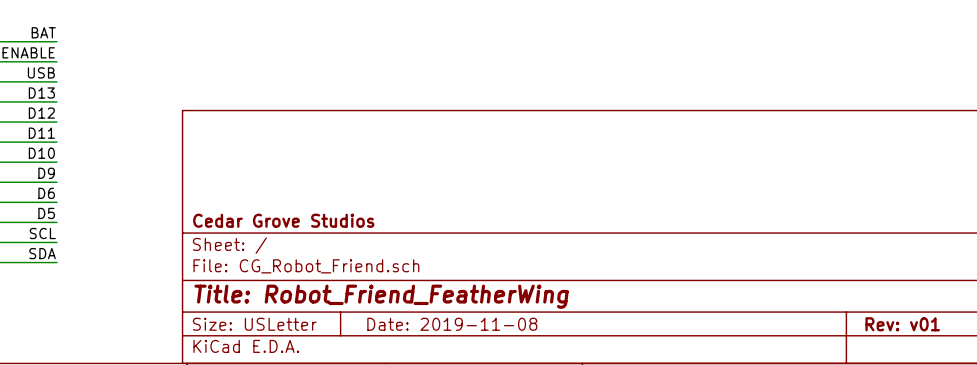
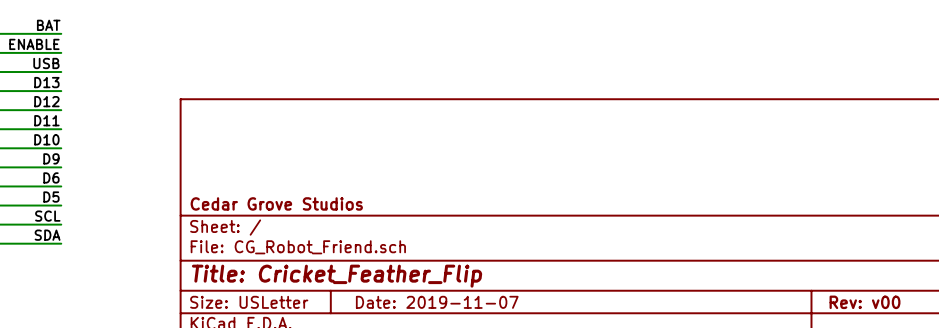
title block: Title: Robot_Friend_FeatherWing (381, 296) -> Title: Cricket_Feather_Flip (337, 276)
title block: Date: 2019-11-08 (452, 324) -> Date: 2019-11-07 (437, 302)
title block: Rev: v01 (902, 324) -> Rev: v00 (865, 302)

